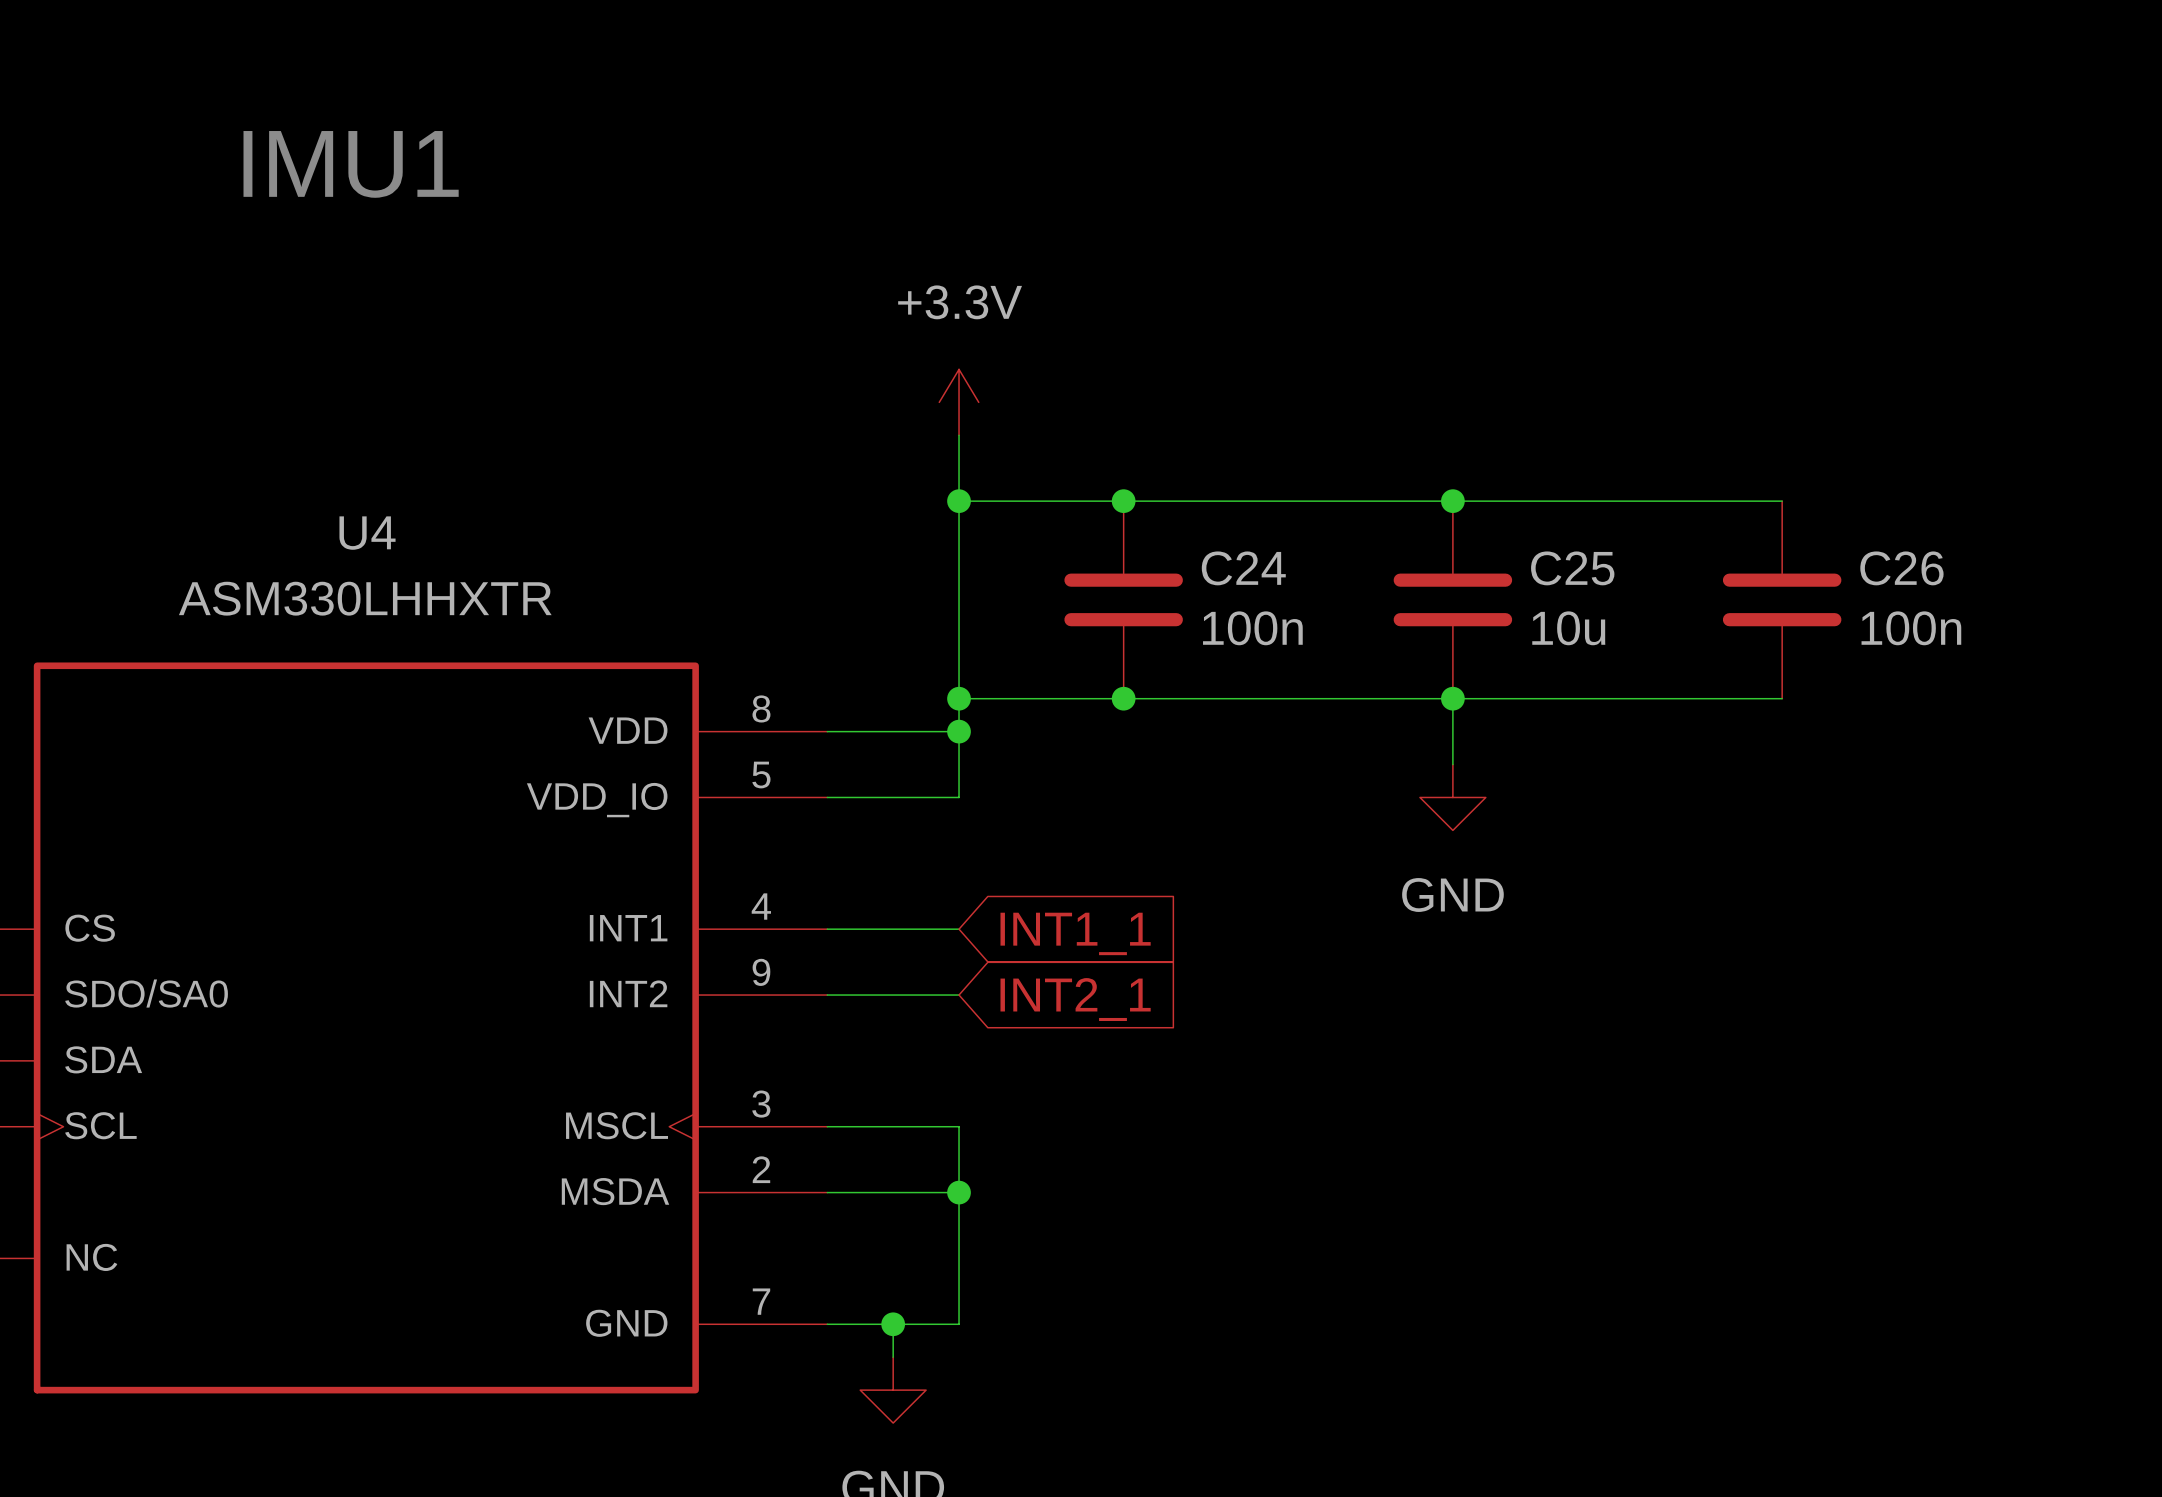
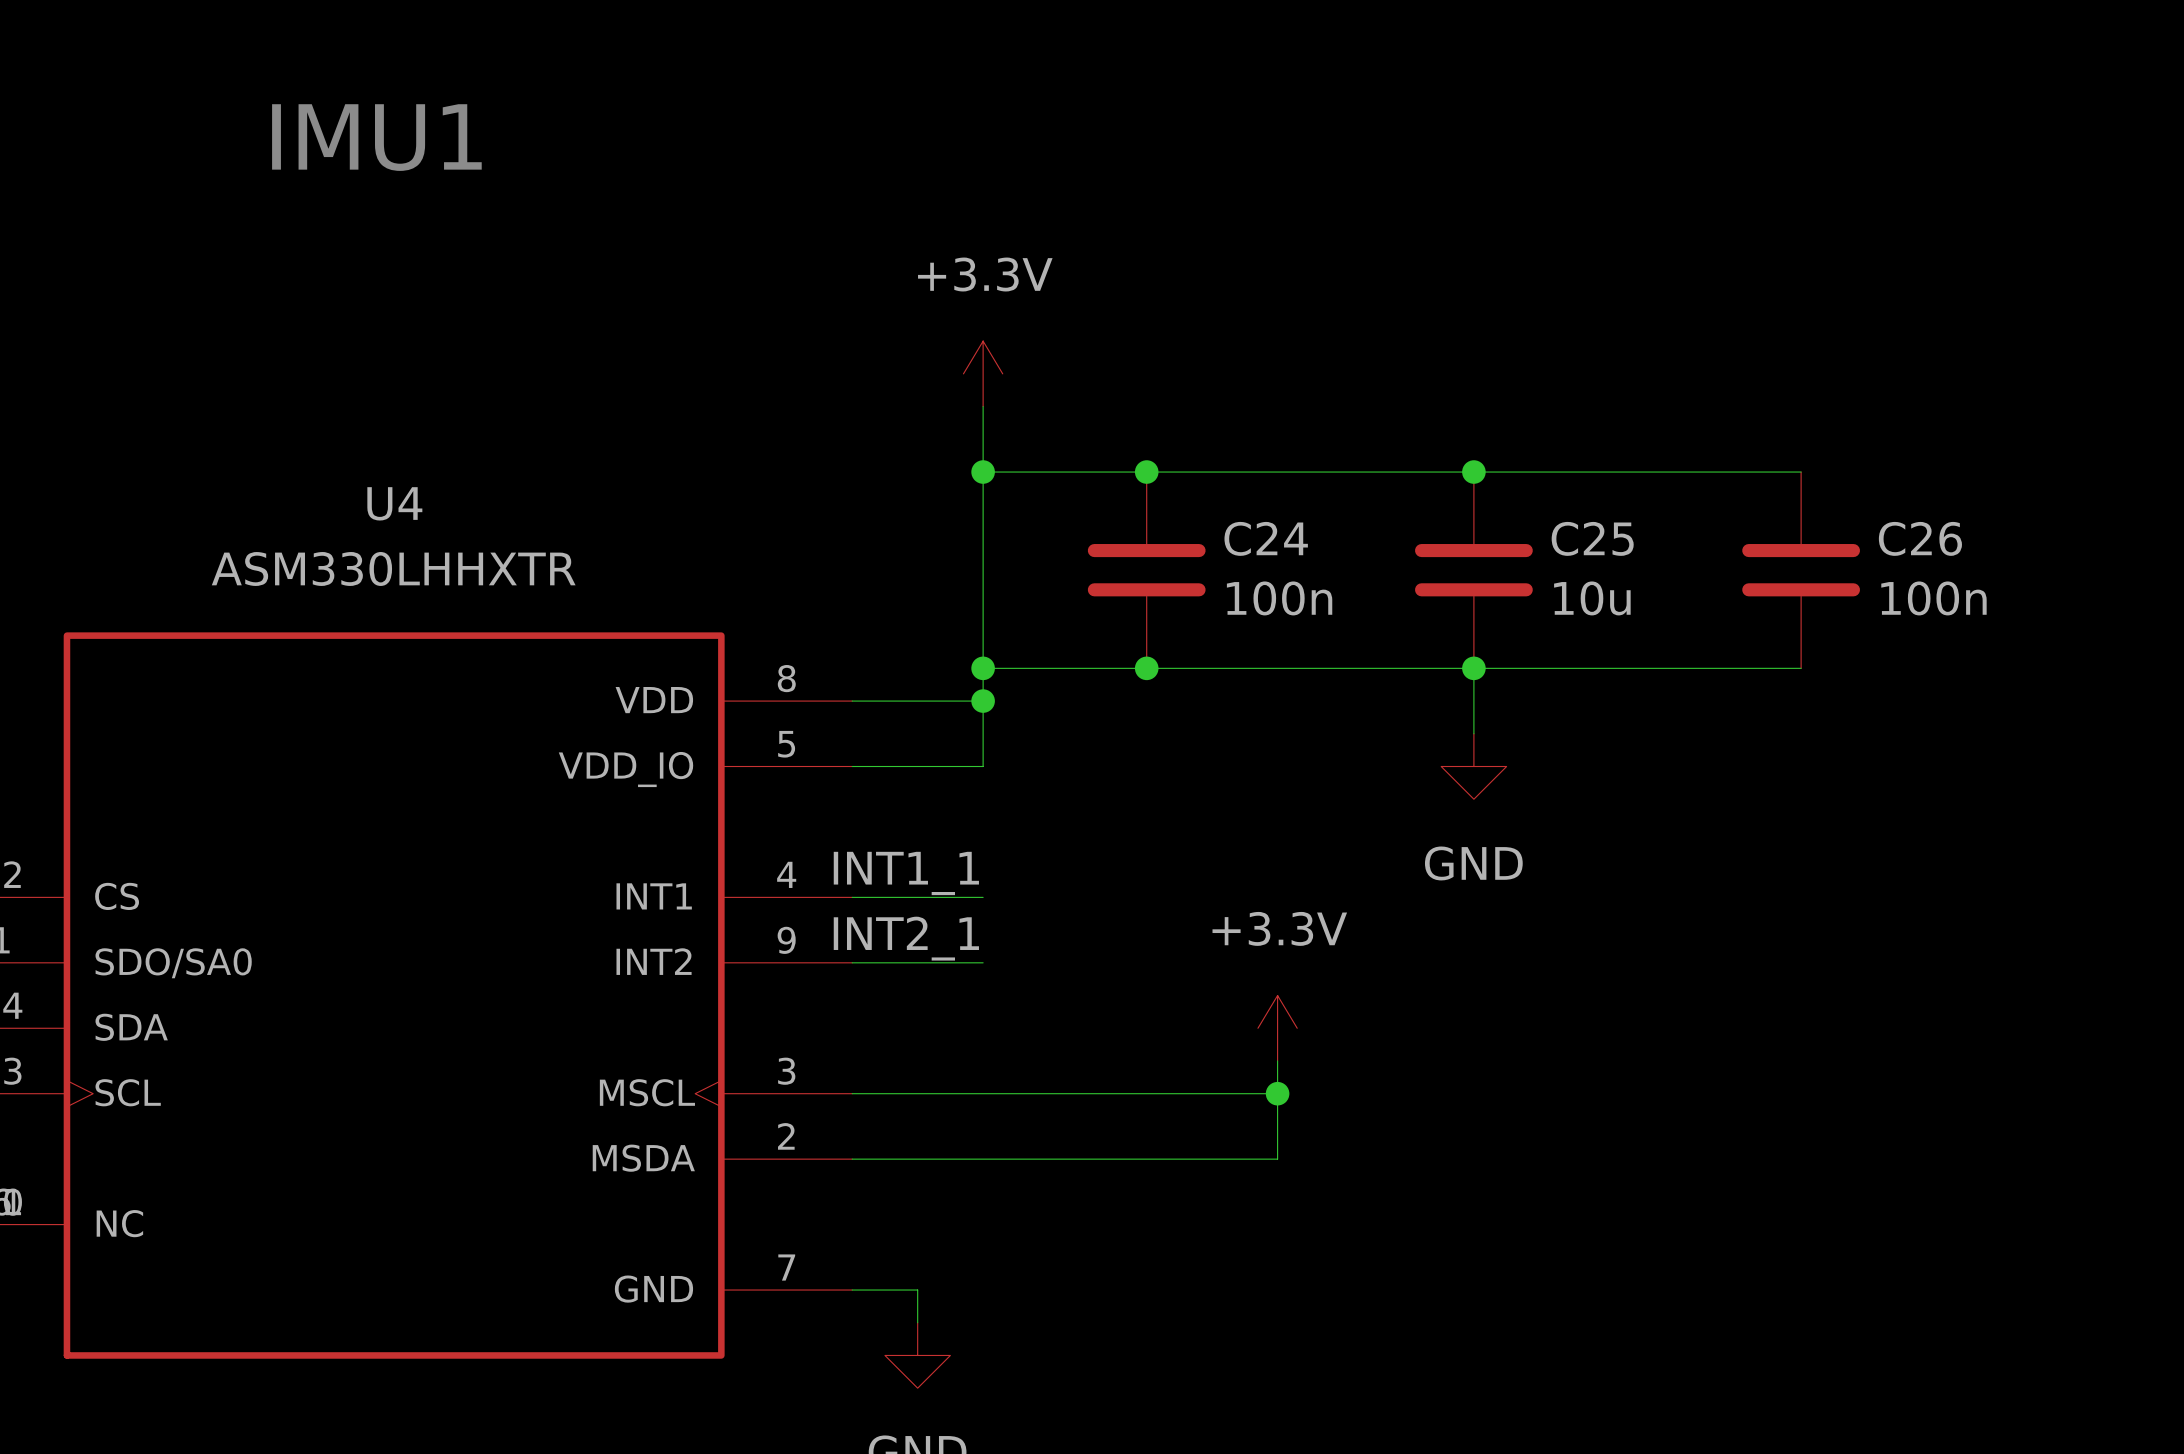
label: none -> INT1_1 (906, 873)
global label: INT1_1 (1075, 933) -> none
label: none -> INT2_1 (906, 938)
global label: INT2_1 (1075, 999) -> none
power symbol: none -> +3.3V (1277, 1028)
wire: none -> (1277, 1060) (1277, 1159) (983, 1159)
wire: (959, 1126) (959, 1324) (893, 1324) -> (983, 1093) (1277, 1093)
junction: none -> (1277, 1093)
junction: (959, 1192) -> none
junction: (893, 1324) -> none

